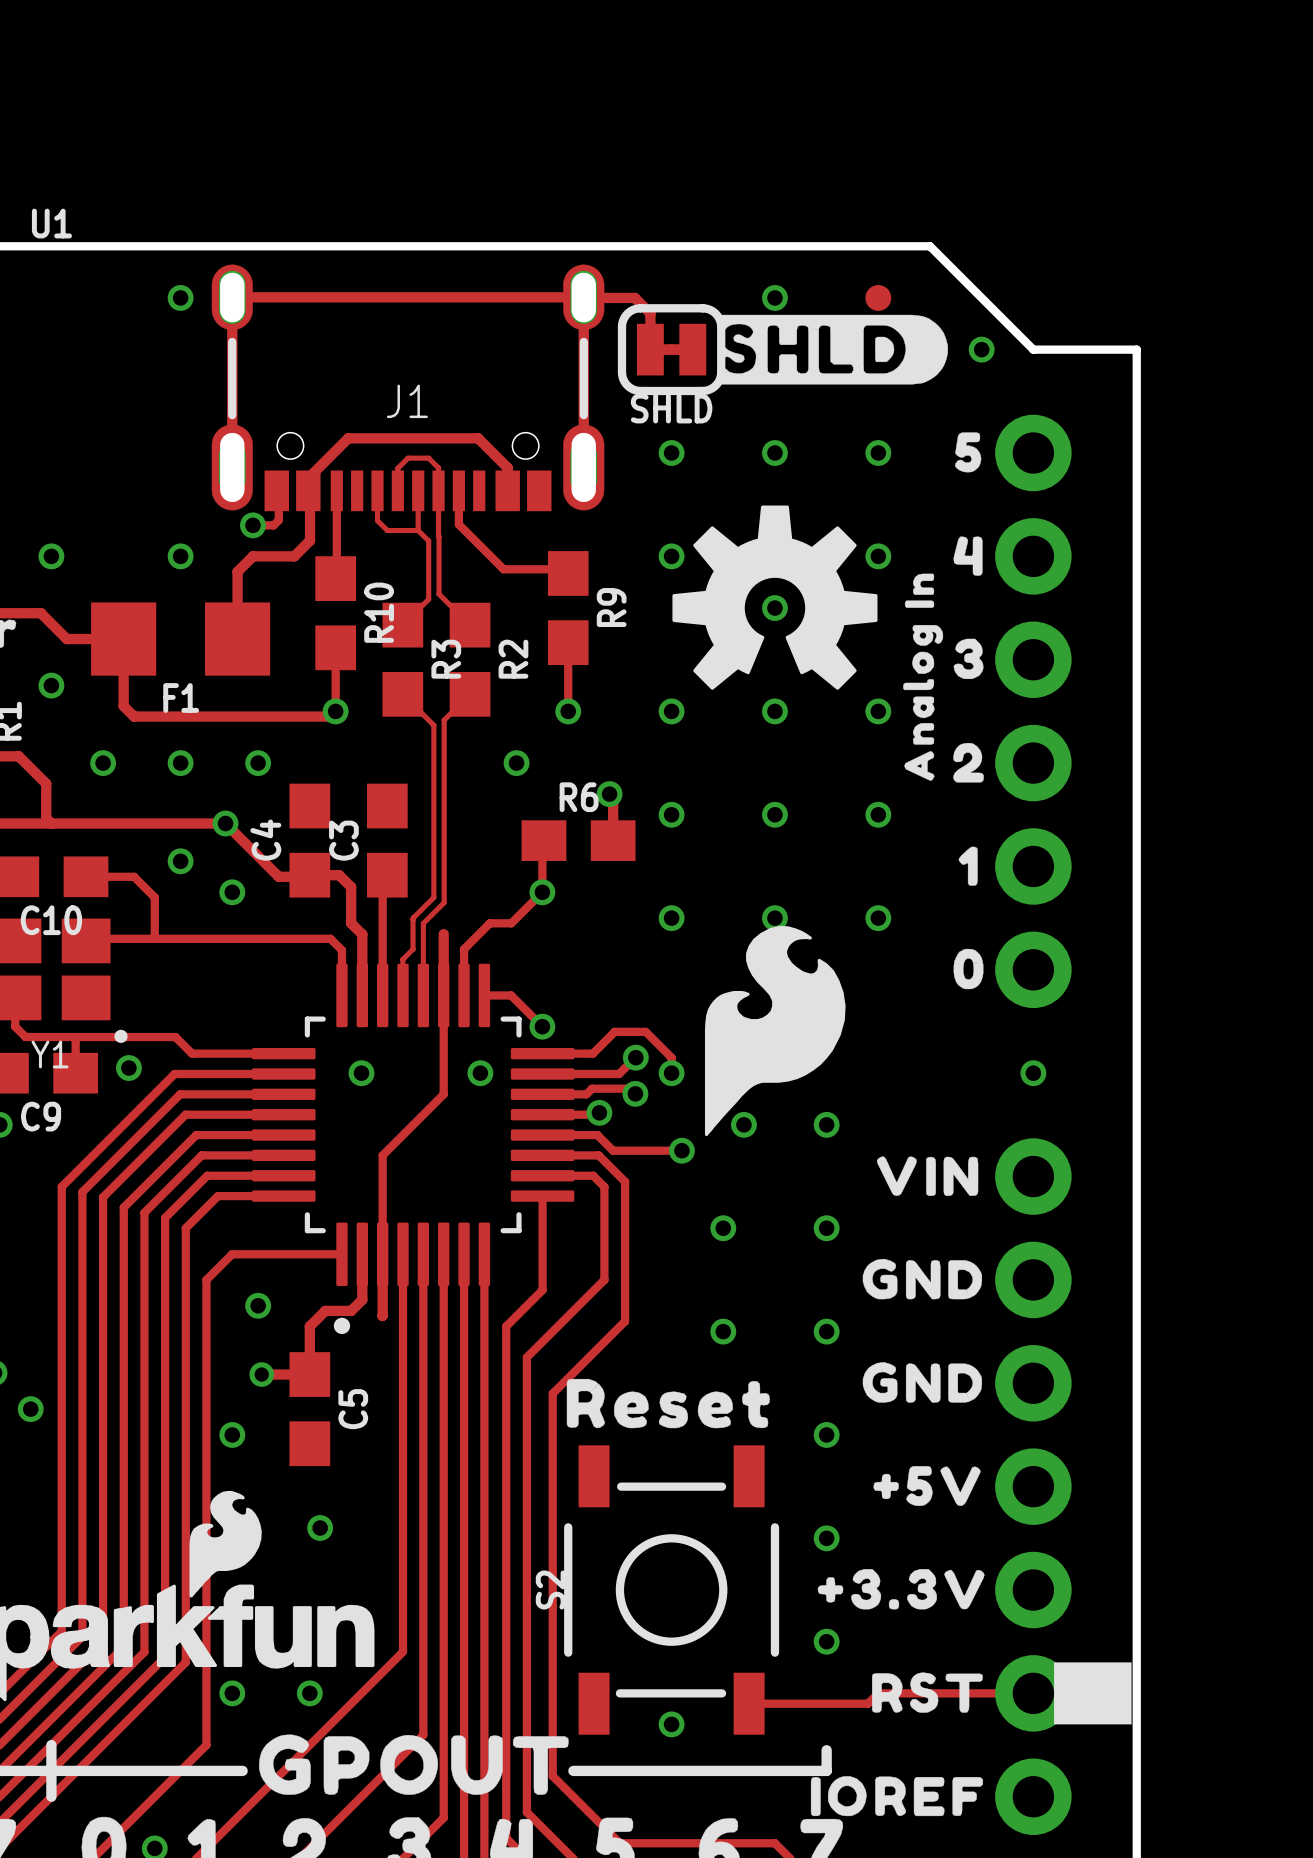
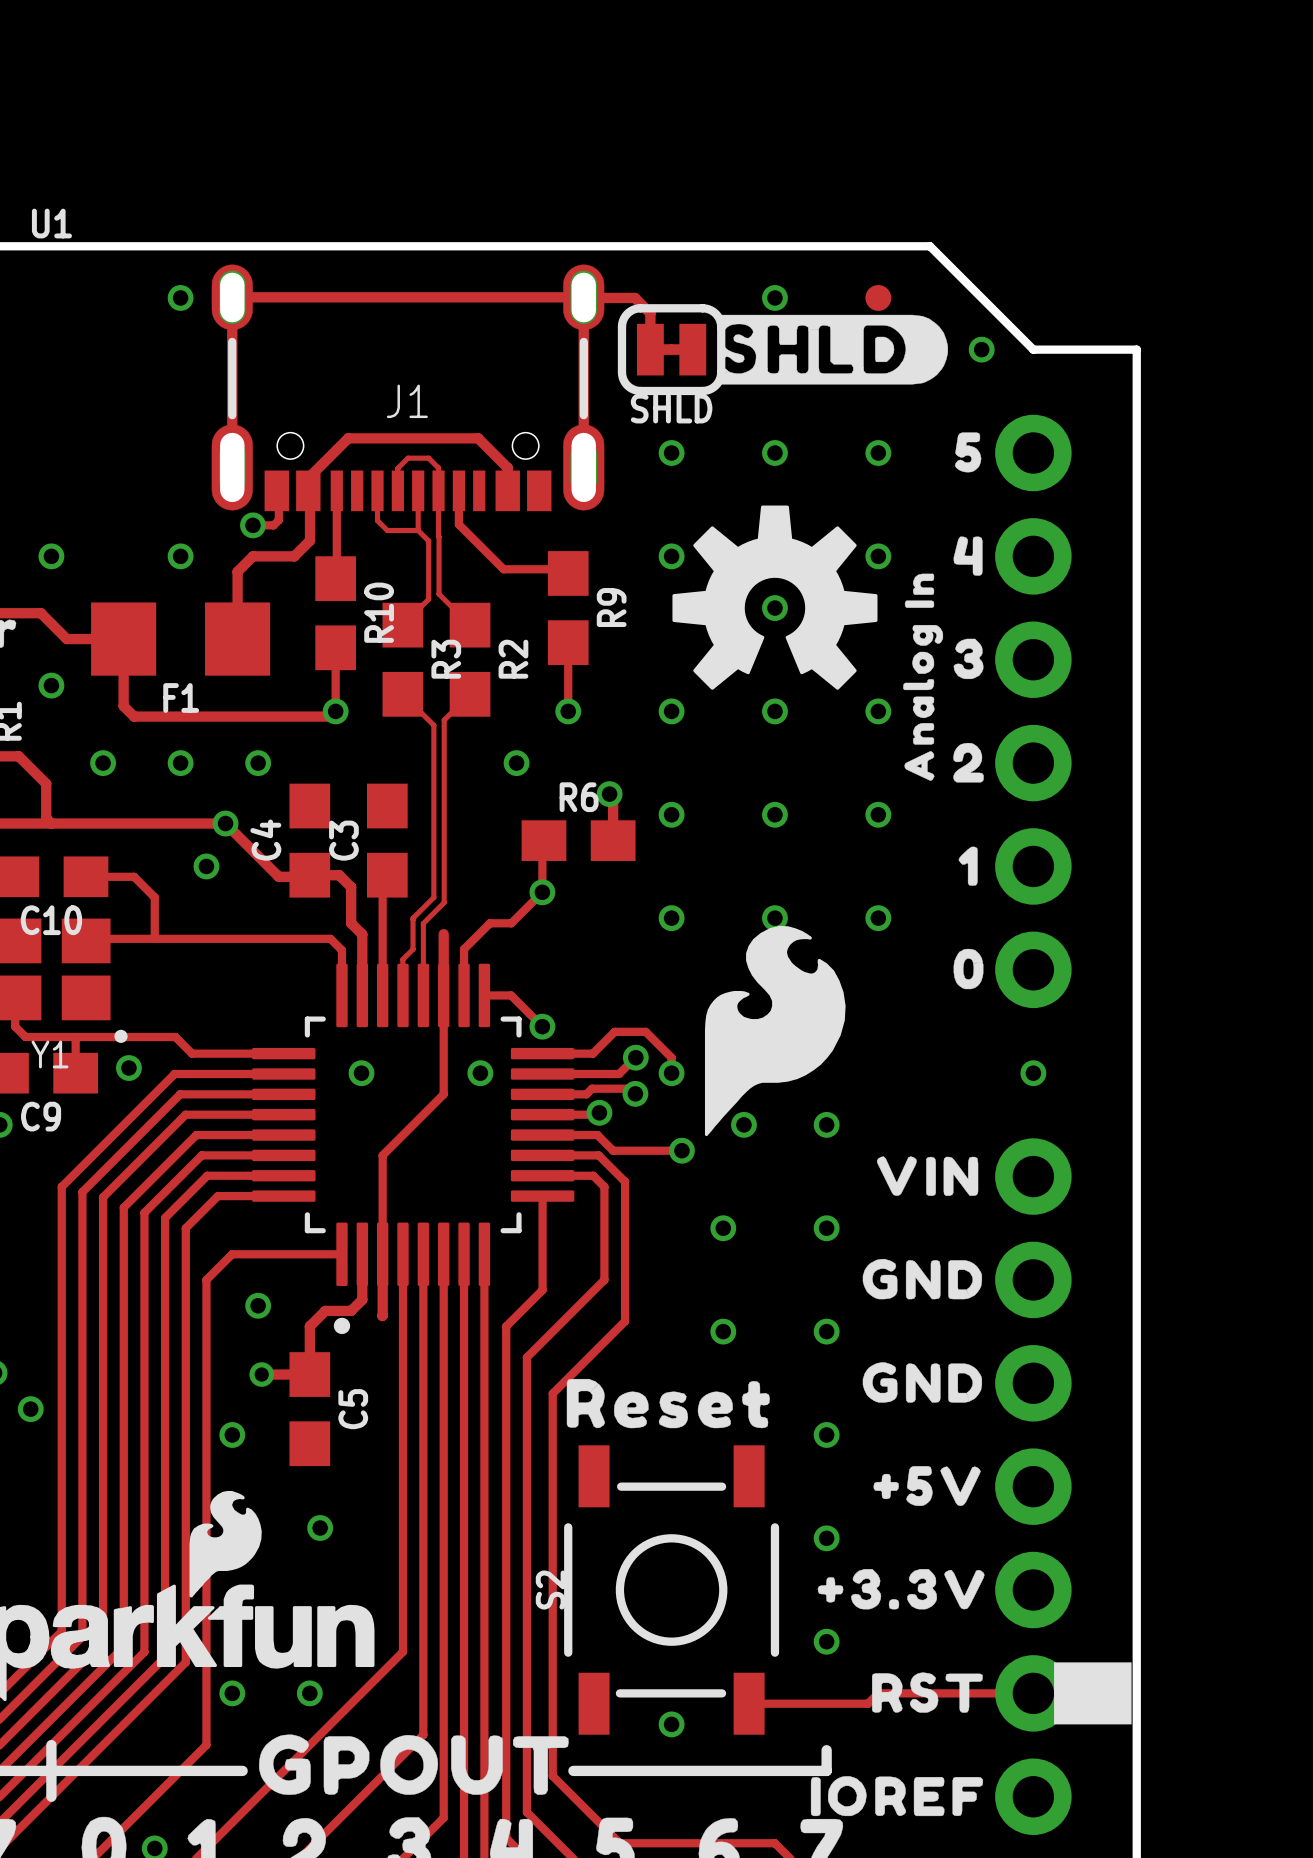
via: (180, 861) -> none
via position: (232, 892) -> (206, 866)

